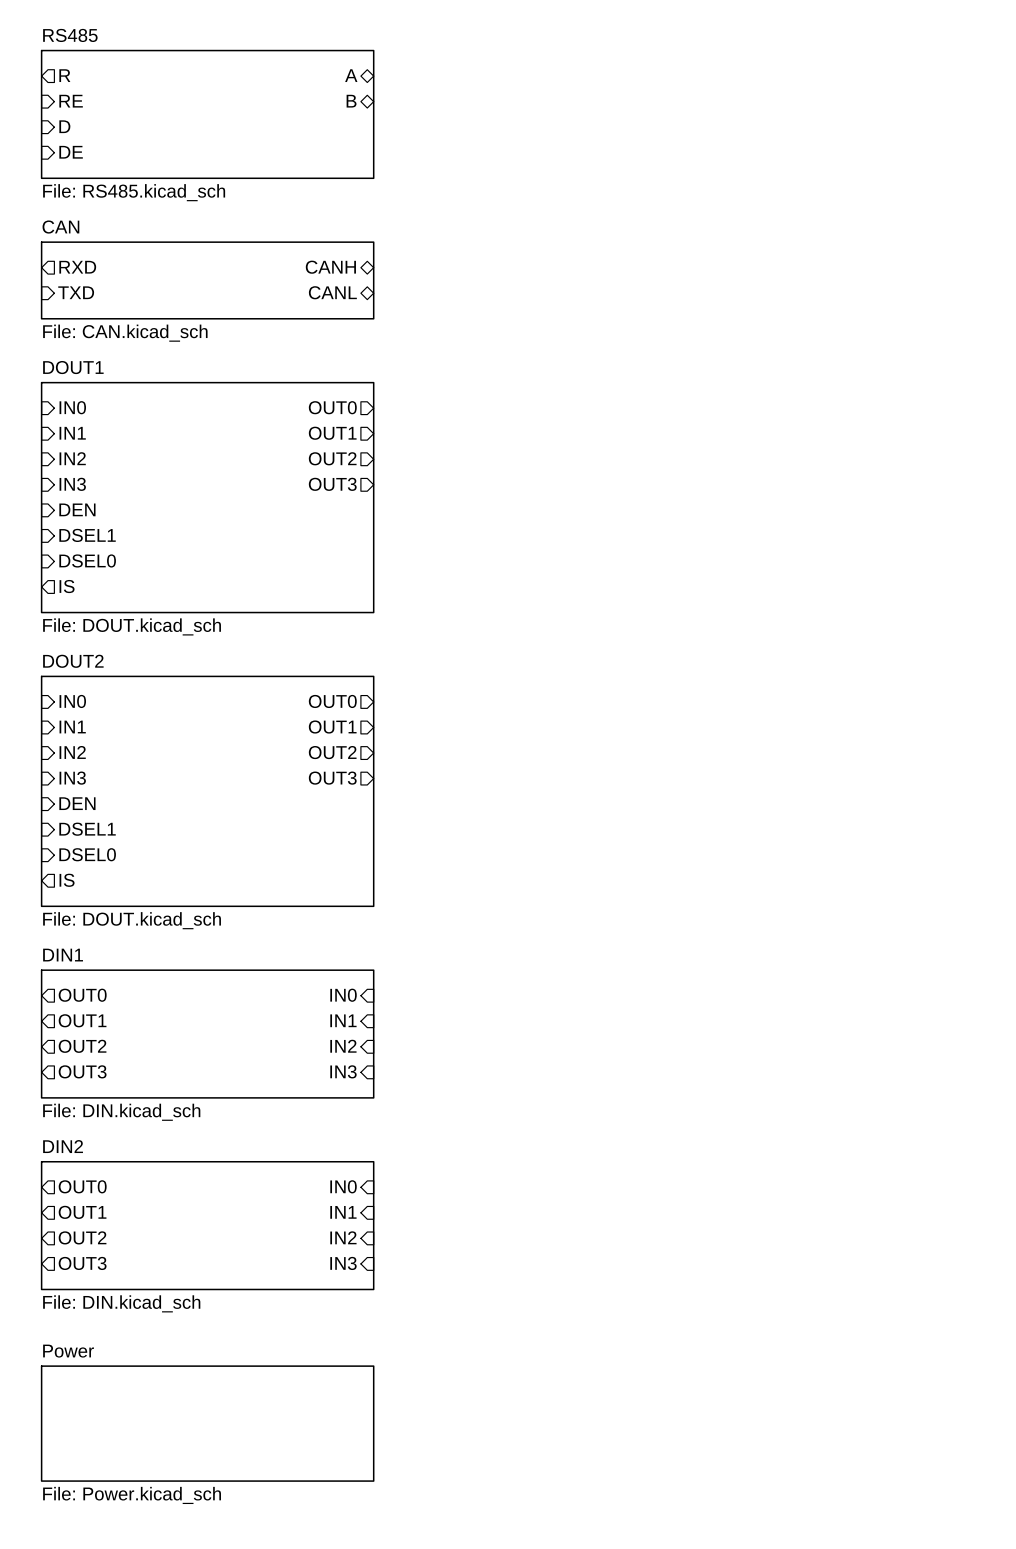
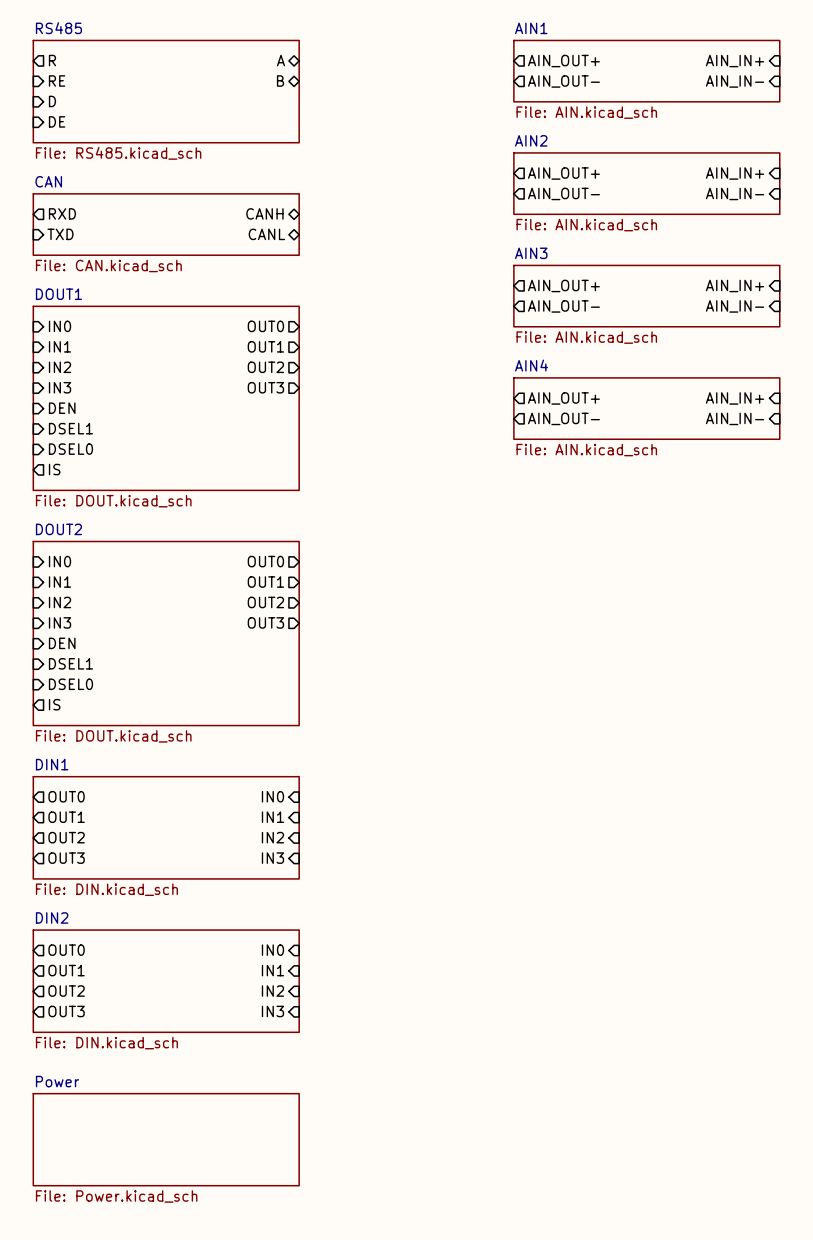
sheet pin: none -> AIN_OUT+ (563, 61)
sheet pin: none -> AIN_IN+ (735, 61)
sheet AIN1: none -> File: AIN.kicad_sch (646, 71)
sheet pin: none -> AIN_OUT- (563, 81)
sheet pin: none -> AIN_IN- (735, 81)
sheet pin: none -> AIN_OUT+ (563, 173)
sheet pin: none -> AIN_IN+ (735, 173)
sheet AIN2: none -> File: AIN.kicad_sch (646, 183)
sheet pin: none -> AIN_OUT- (563, 193)
sheet pin: none -> AIN_IN- (735, 193)
sheet pin: none -> AIN_OUT+ (563, 285)
sheet pin: none -> AIN_IN+ (735, 285)
sheet AIN3: none -> File: AIN.kicad_sch (646, 296)
sheet pin: none -> AIN_OUT- (563, 306)
sheet pin: none -> AIN_IN- (735, 306)
sheet pin: none -> AIN_OUT+ (563, 398)
sheet pin: none -> AIN_IN+ (735, 398)
sheet AIN4: none -> File: AIN.kicad_sch (646, 408)
sheet pin: none -> AIN_OUT- (563, 418)
sheet pin: none -> AIN_IN- (735, 418)

